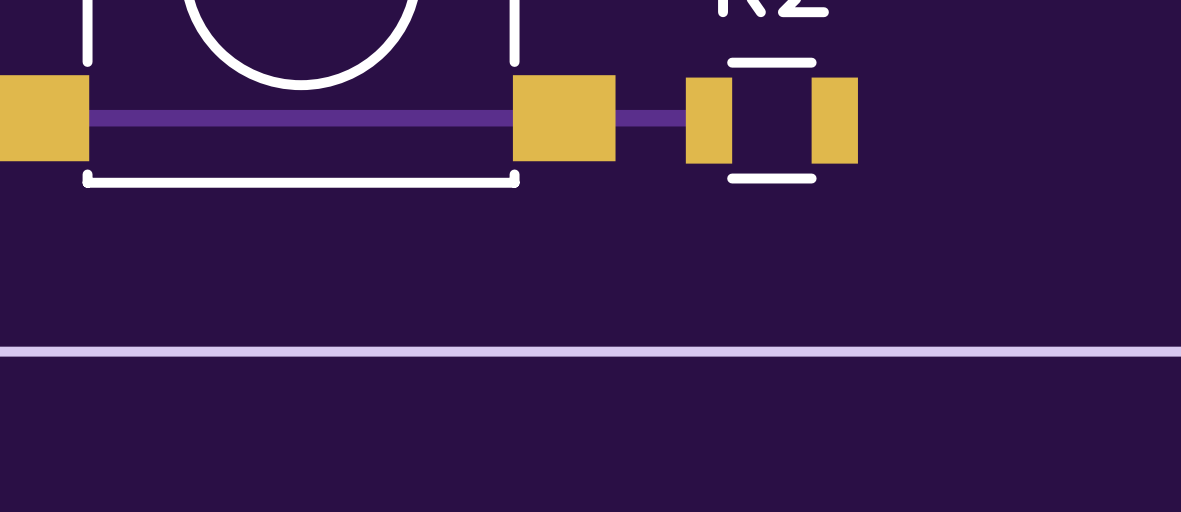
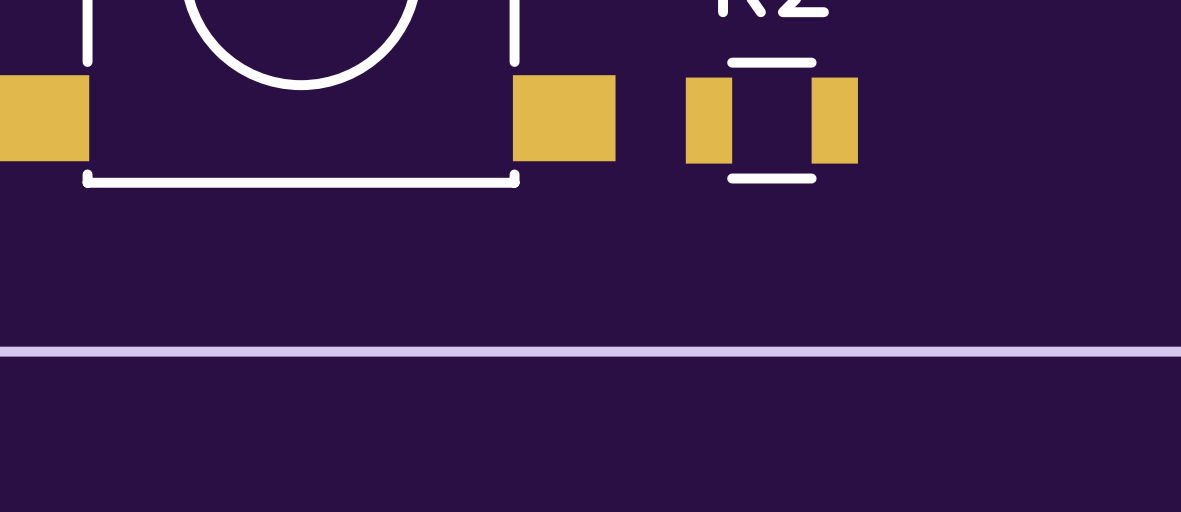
track: (37, 118) (706, 118) (709, 120) -> none

